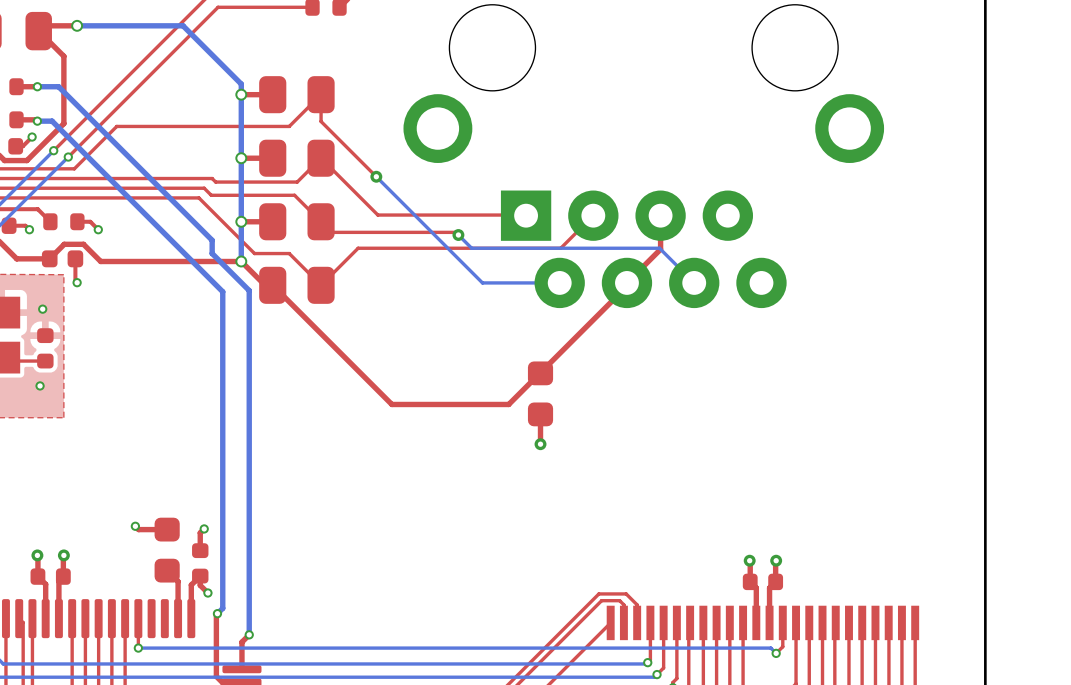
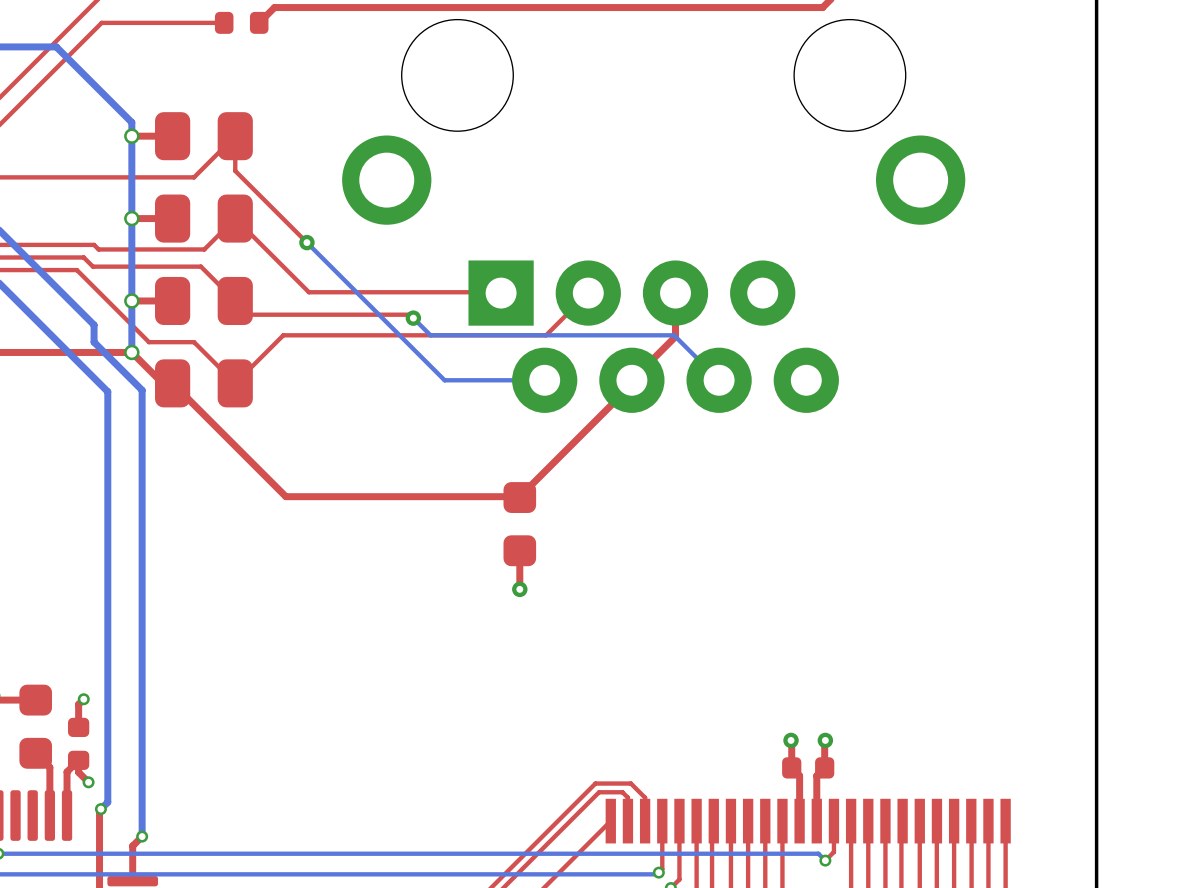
top track: (540, 372) (508, 404) (391, 404) (360, 372) -> (519, 496) (285, 496)

